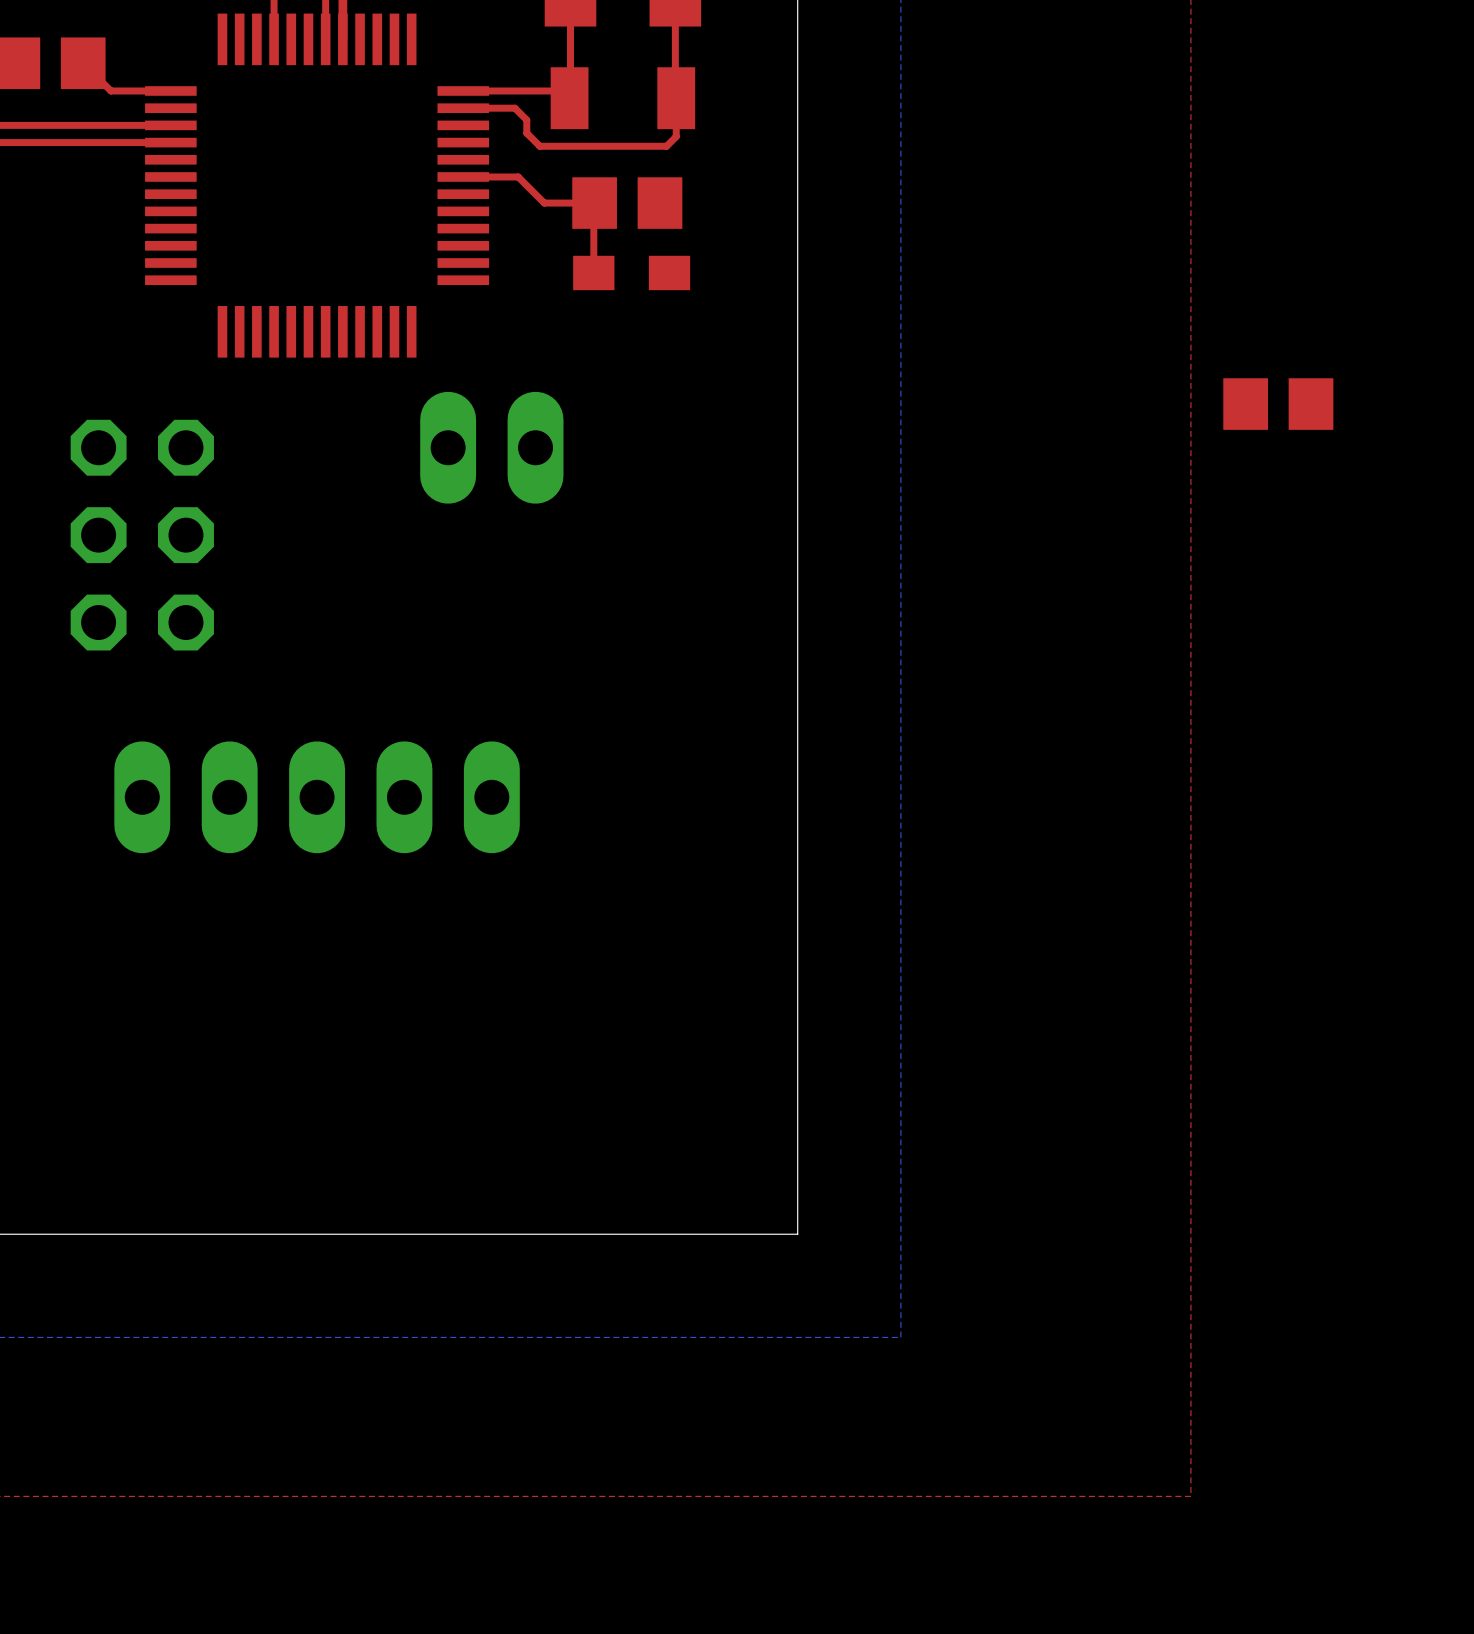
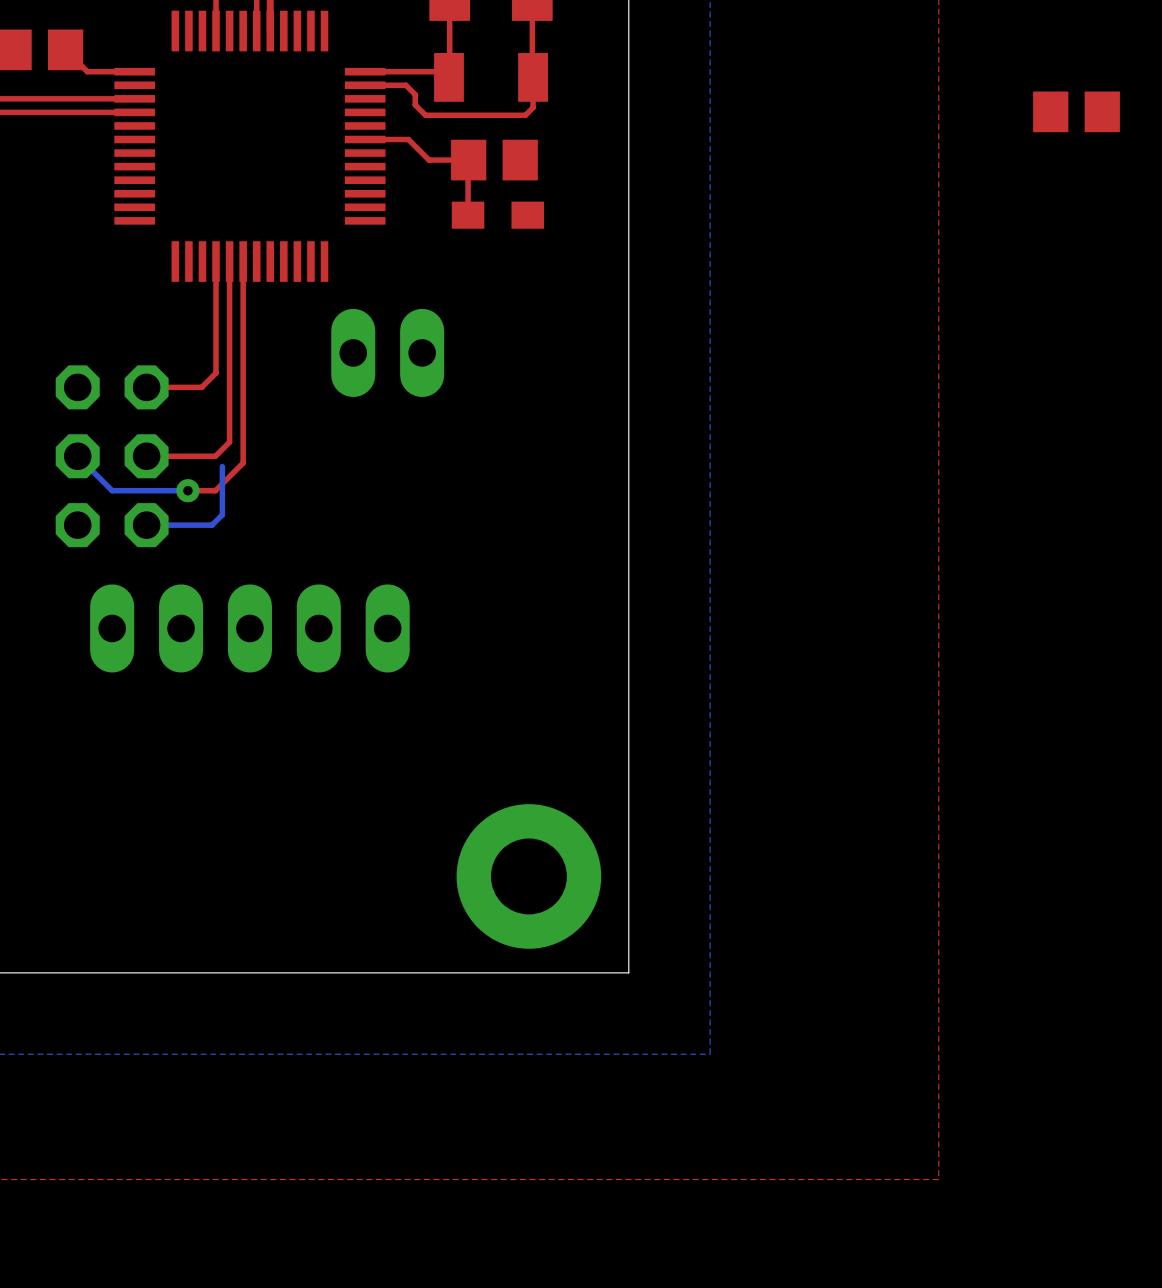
top track: none -> (216, 261) (216, 373) (201, 387) (146, 387)
top track: none -> (229, 261) (229, 442) (215, 456) (146, 456)
top track: none -> (243, 261) (243, 463) (215, 490) (187, 490)
part position: (1278, 404) -> (1076, 111)
part position: (142, 535) -> (112, 456)
bottom track: none -> (77, 456) (112, 490) (187, 490)
bottom track: none -> (222, 466) (222, 514) (212, 525) (146, 525)
via: none -> (187, 490)
part: none -> (528, 876)

